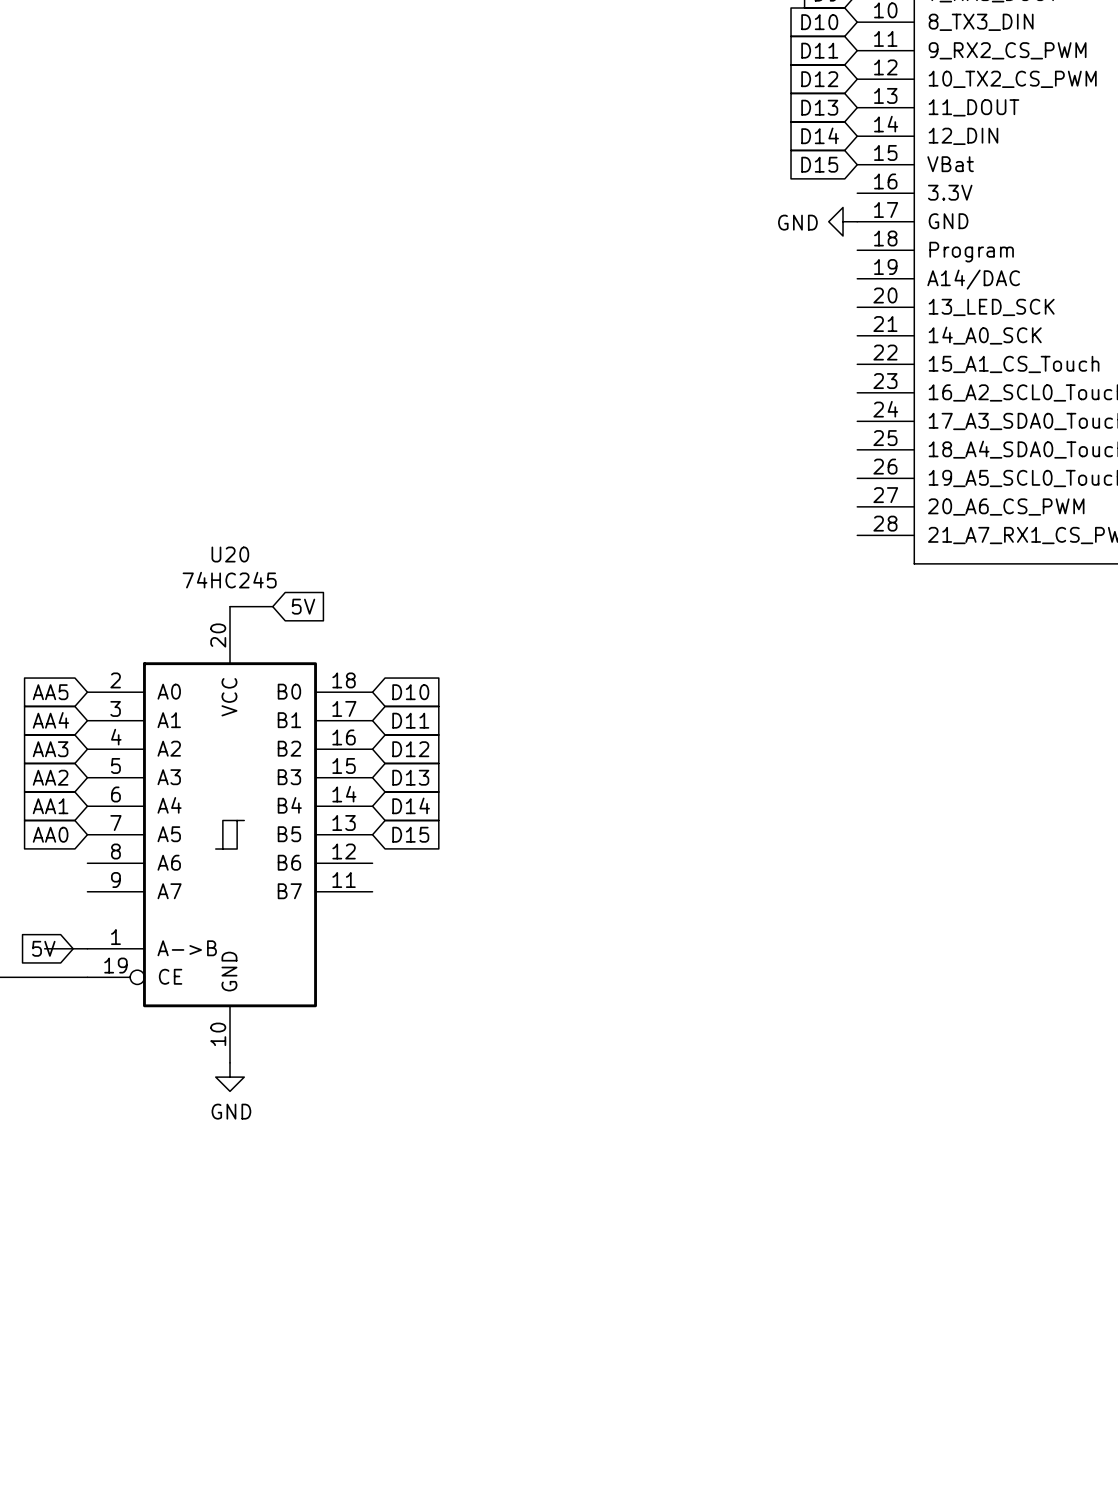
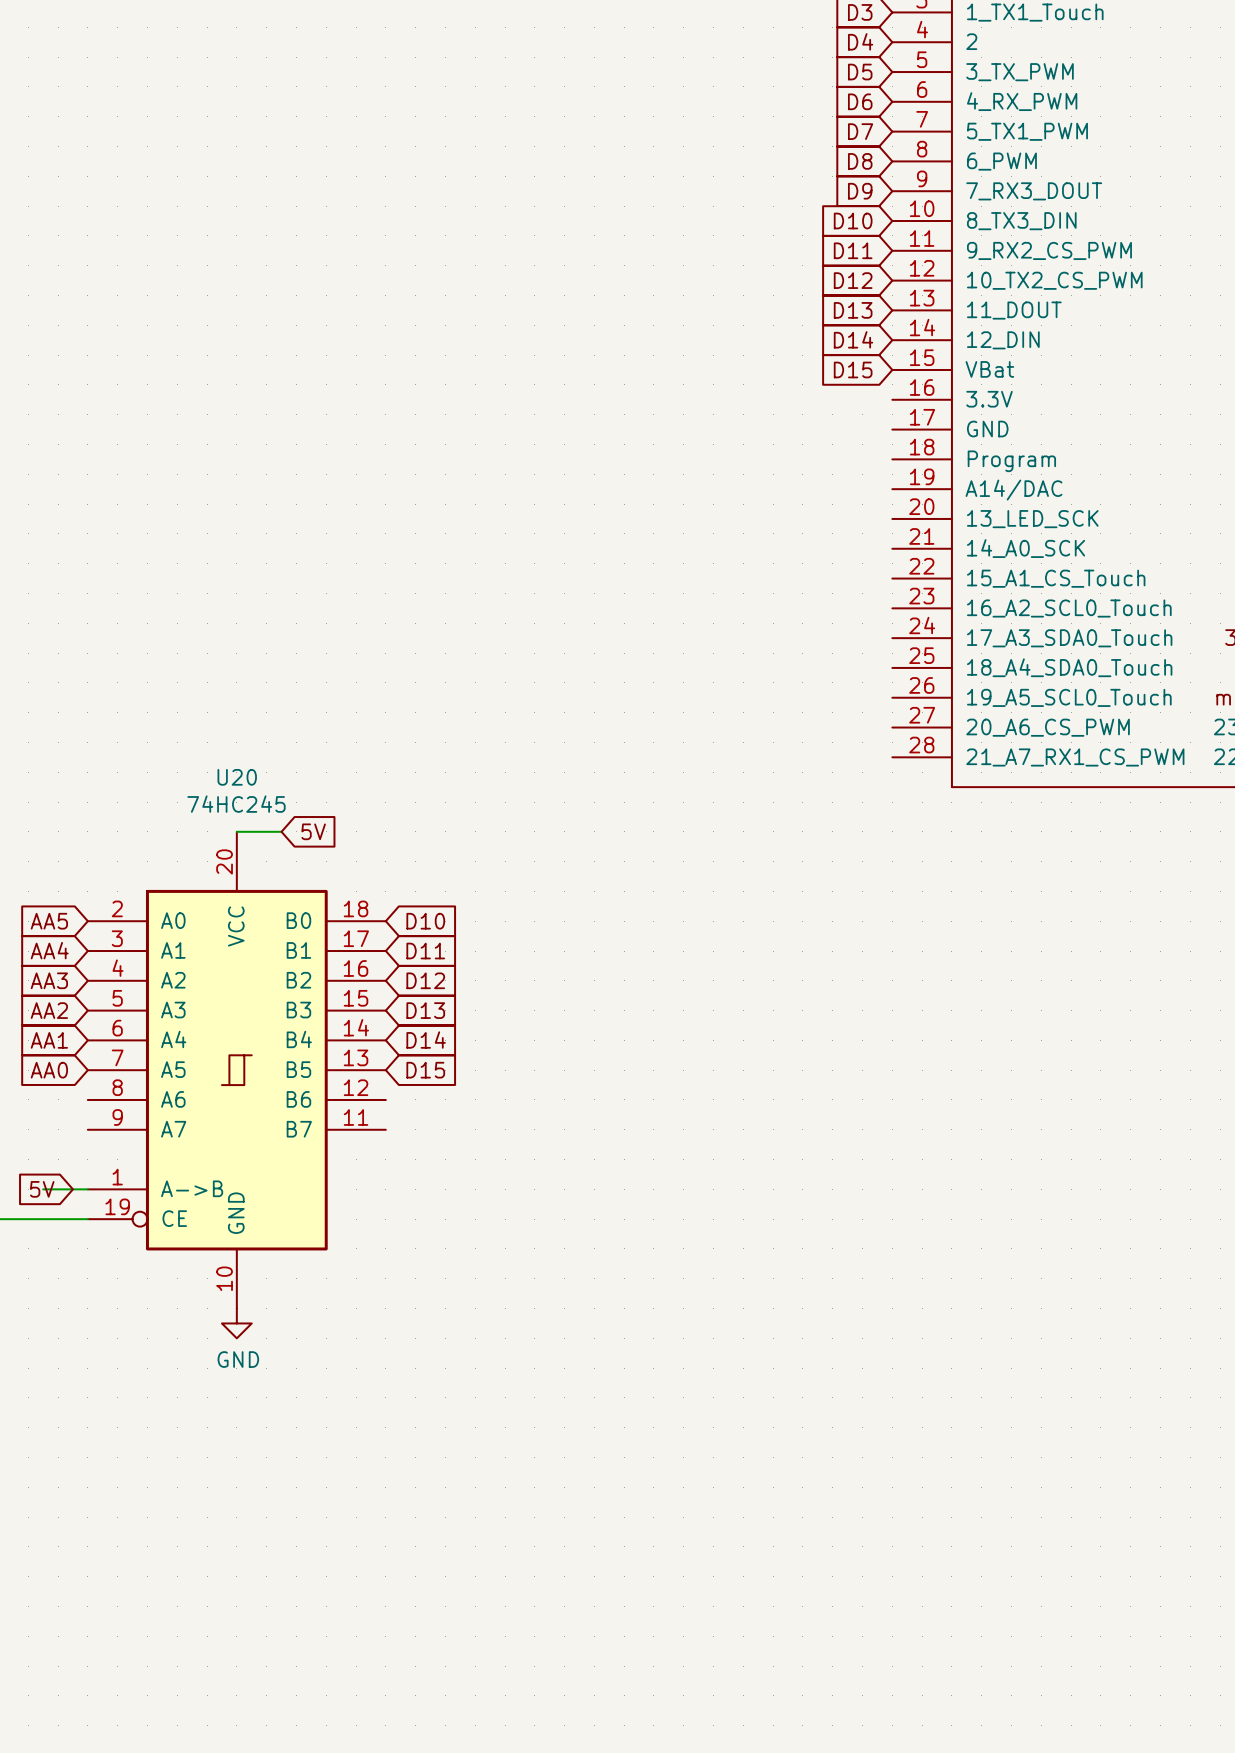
power symbol: GND (843, 221) -> none

